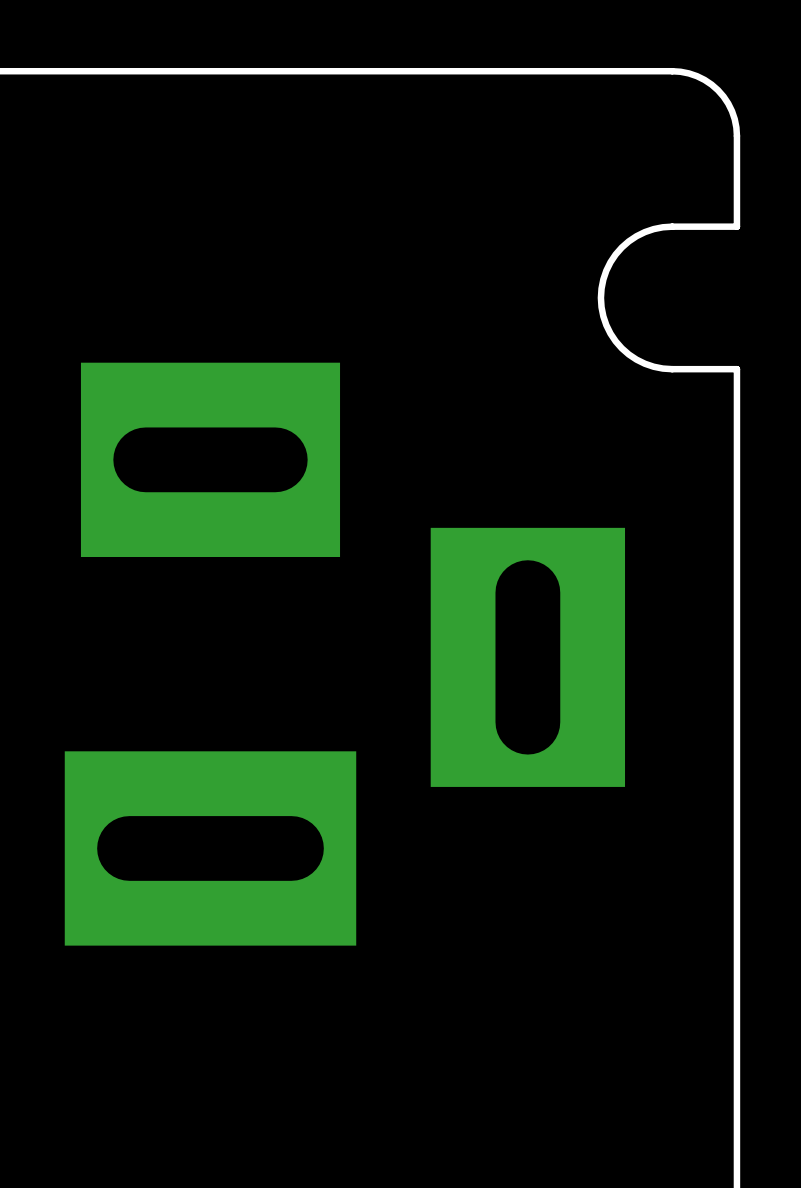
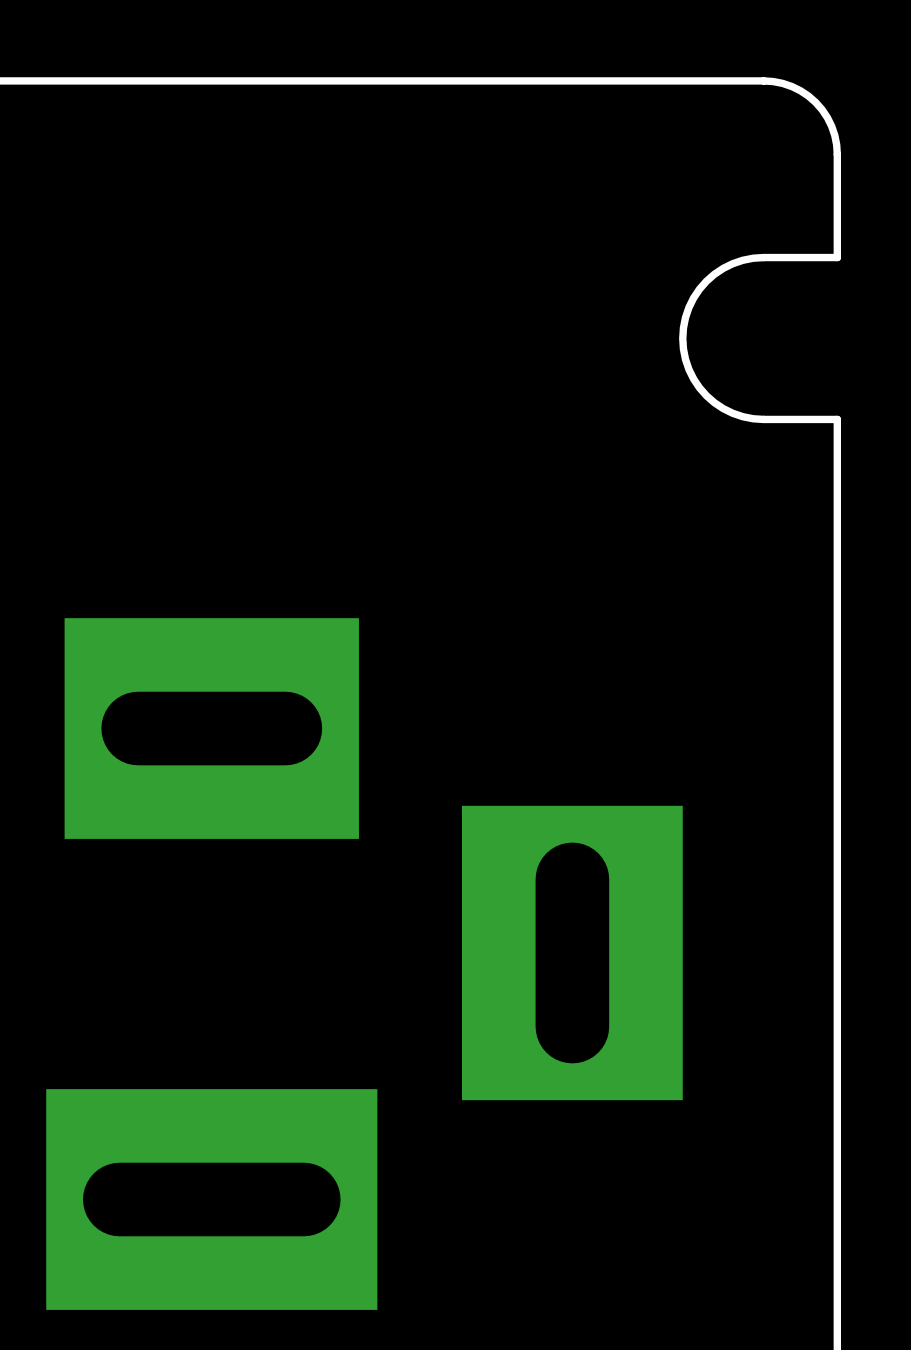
part: (344, 654) -> none
part: none -> (364, 964)

